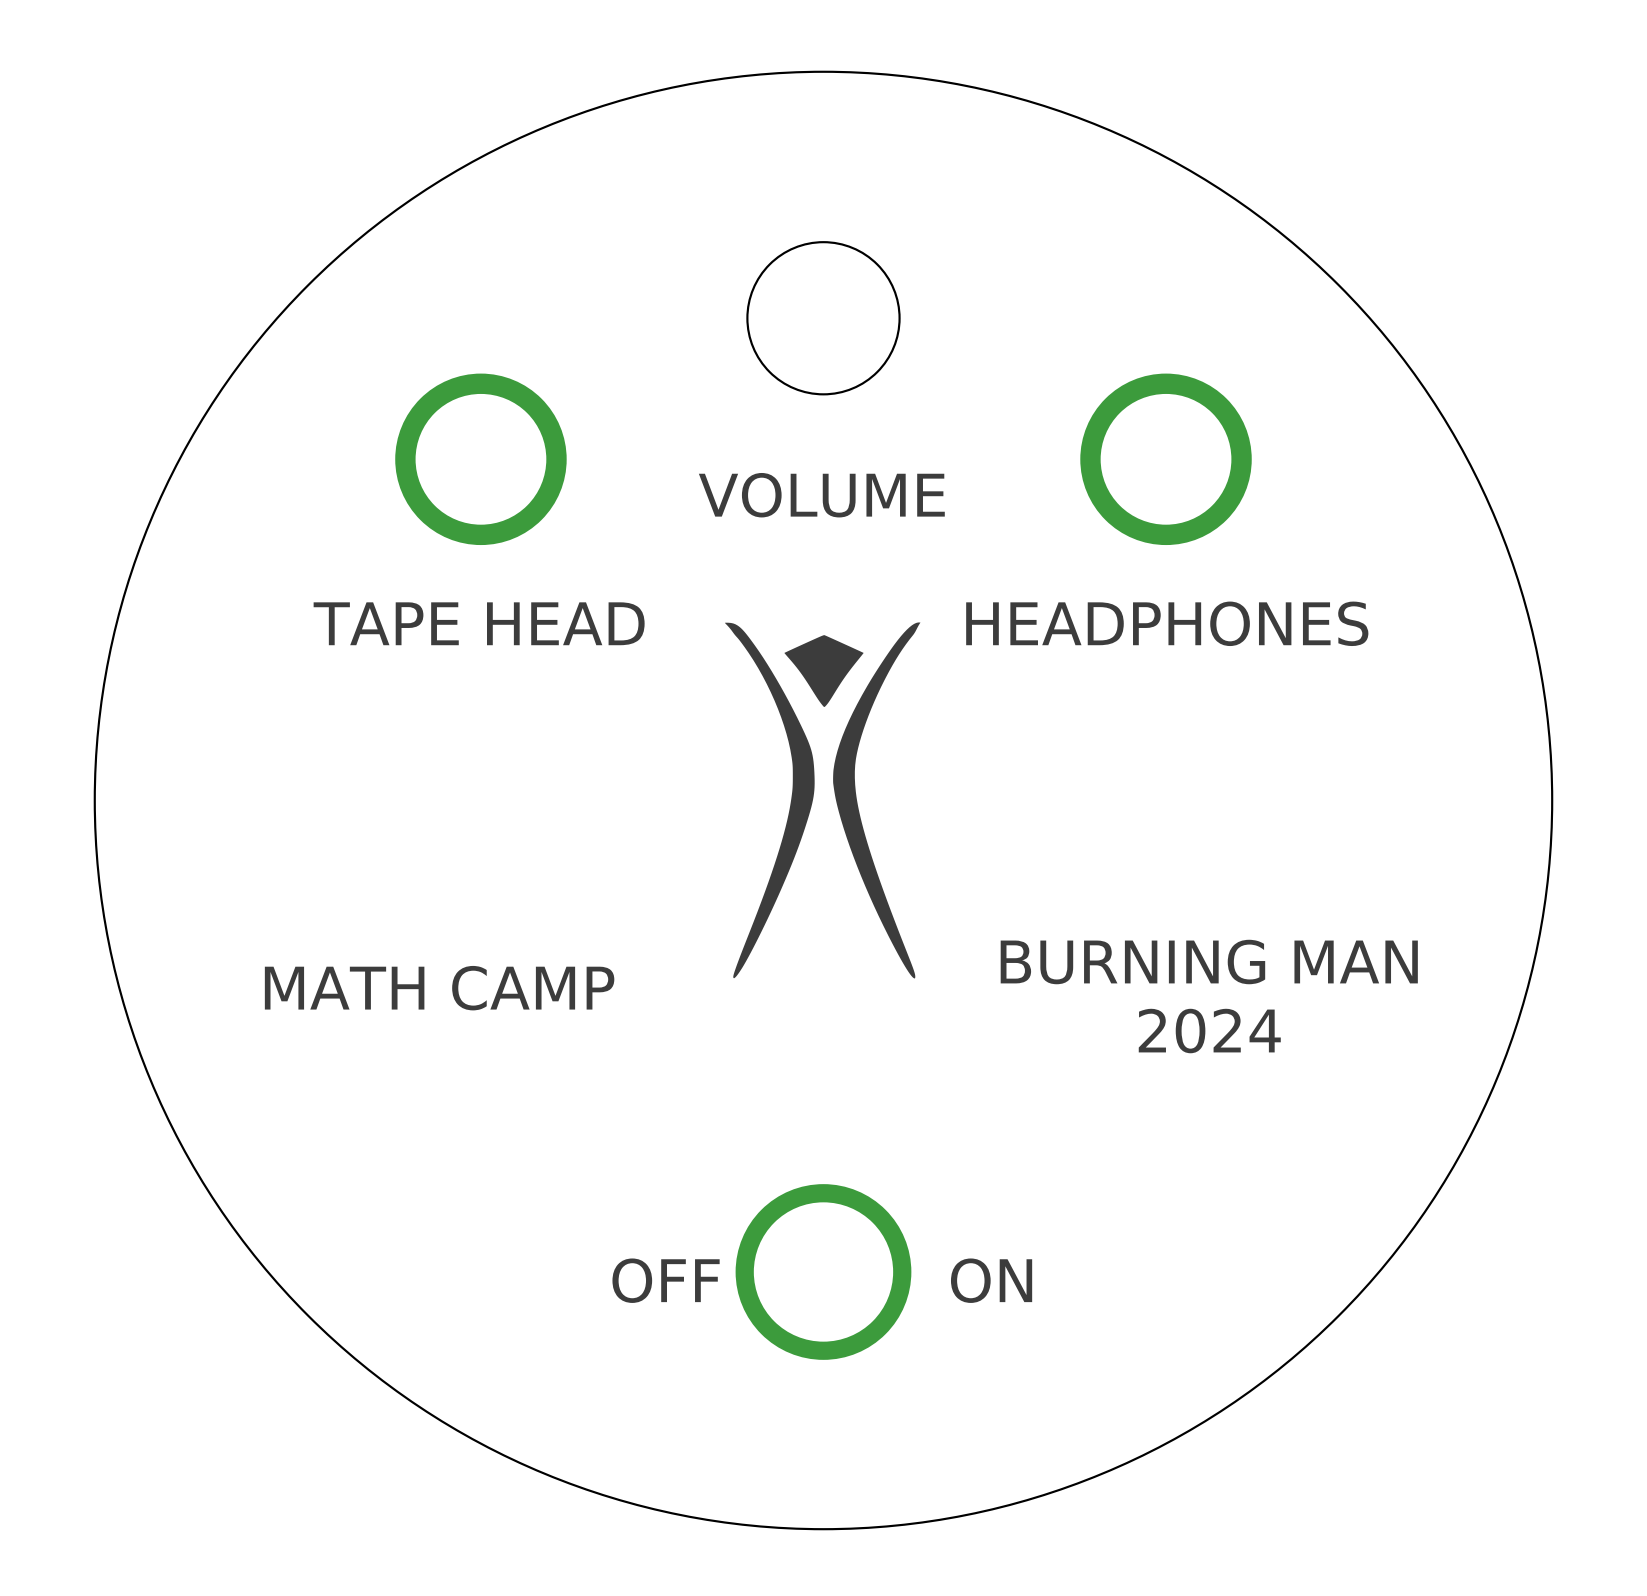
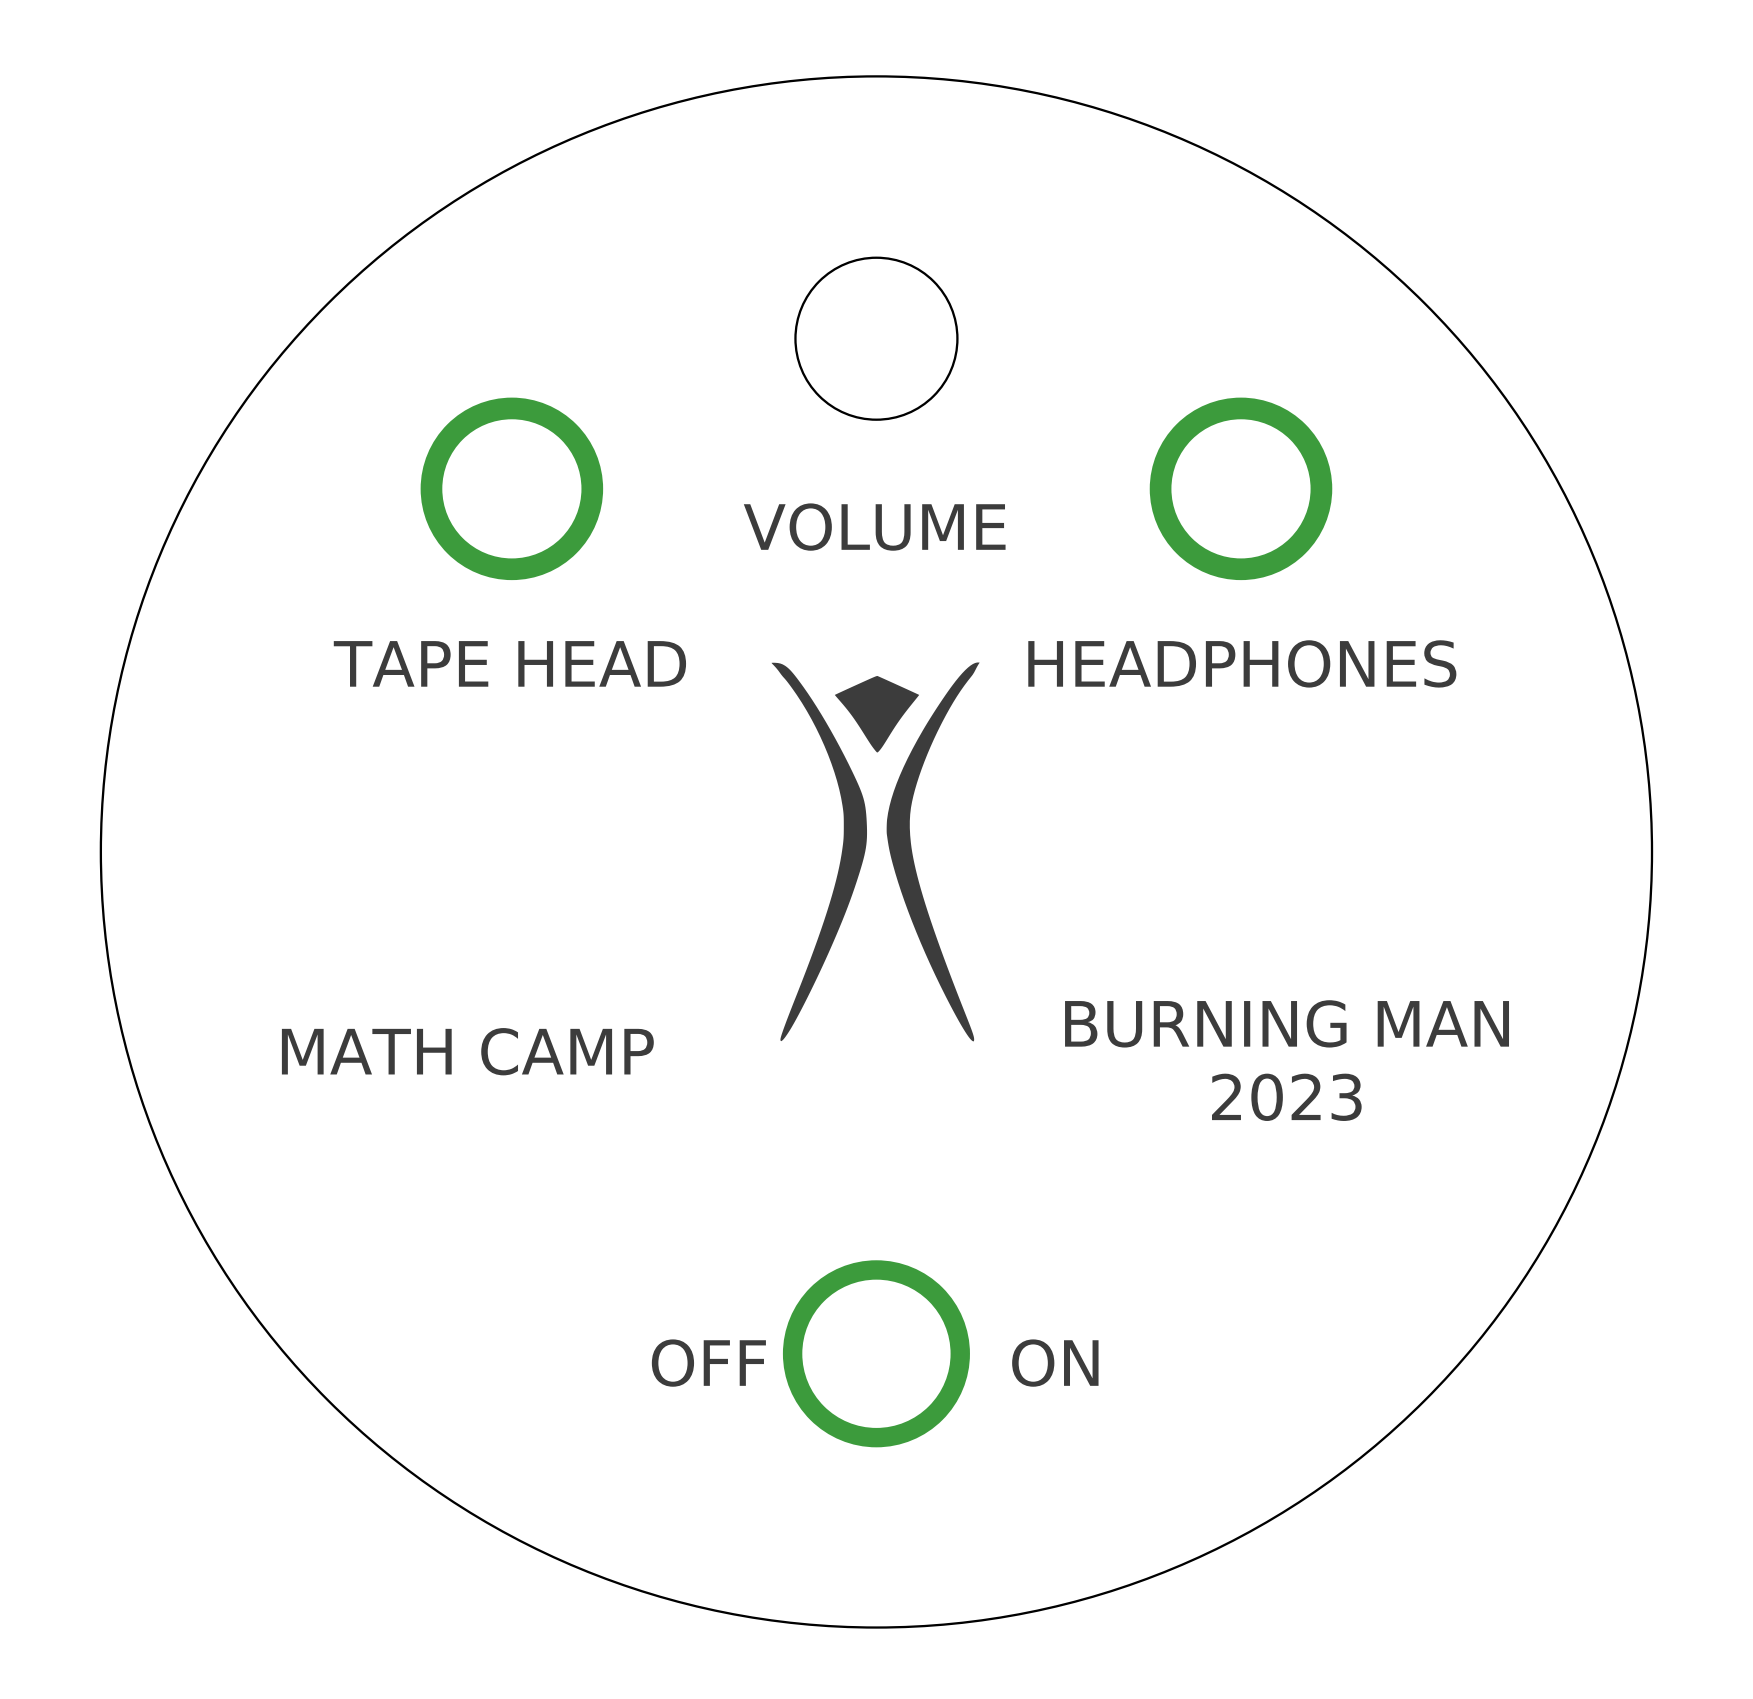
text: 2024 (1209, 1031) -> 2023 (1286, 1097)

